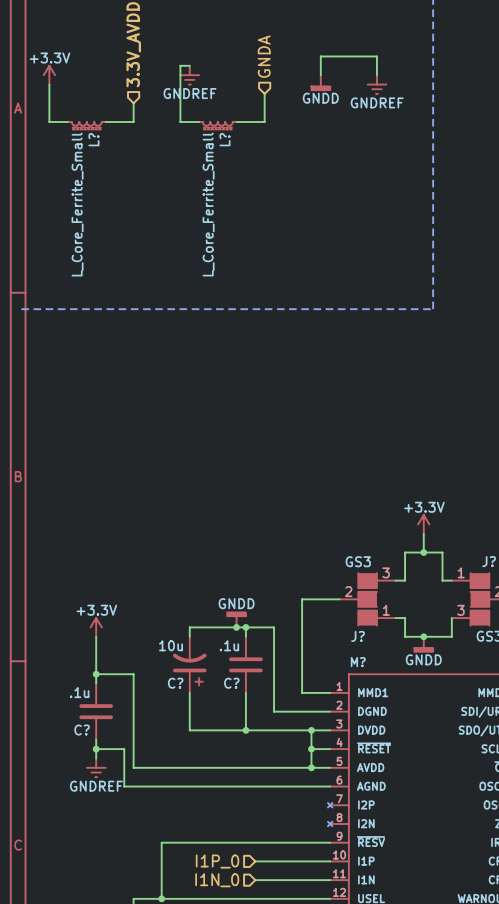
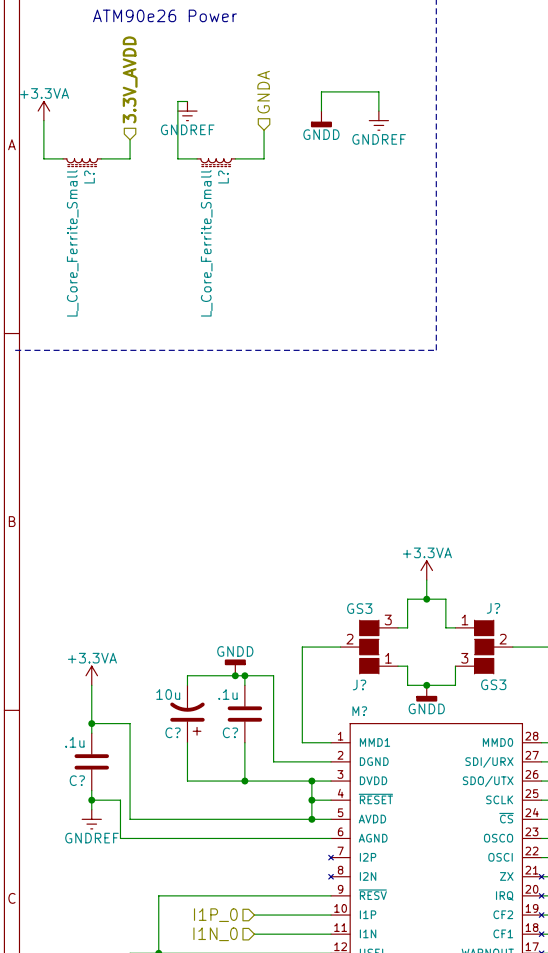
power symbol: +3.3V (49, 75) -> +3.3VA (43, 111)
power symbol: +3.3V (423, 524) -> +3.3VA (426, 570)
power symbol: +3.3V (96, 627) -> +3.3VA (91, 675)

